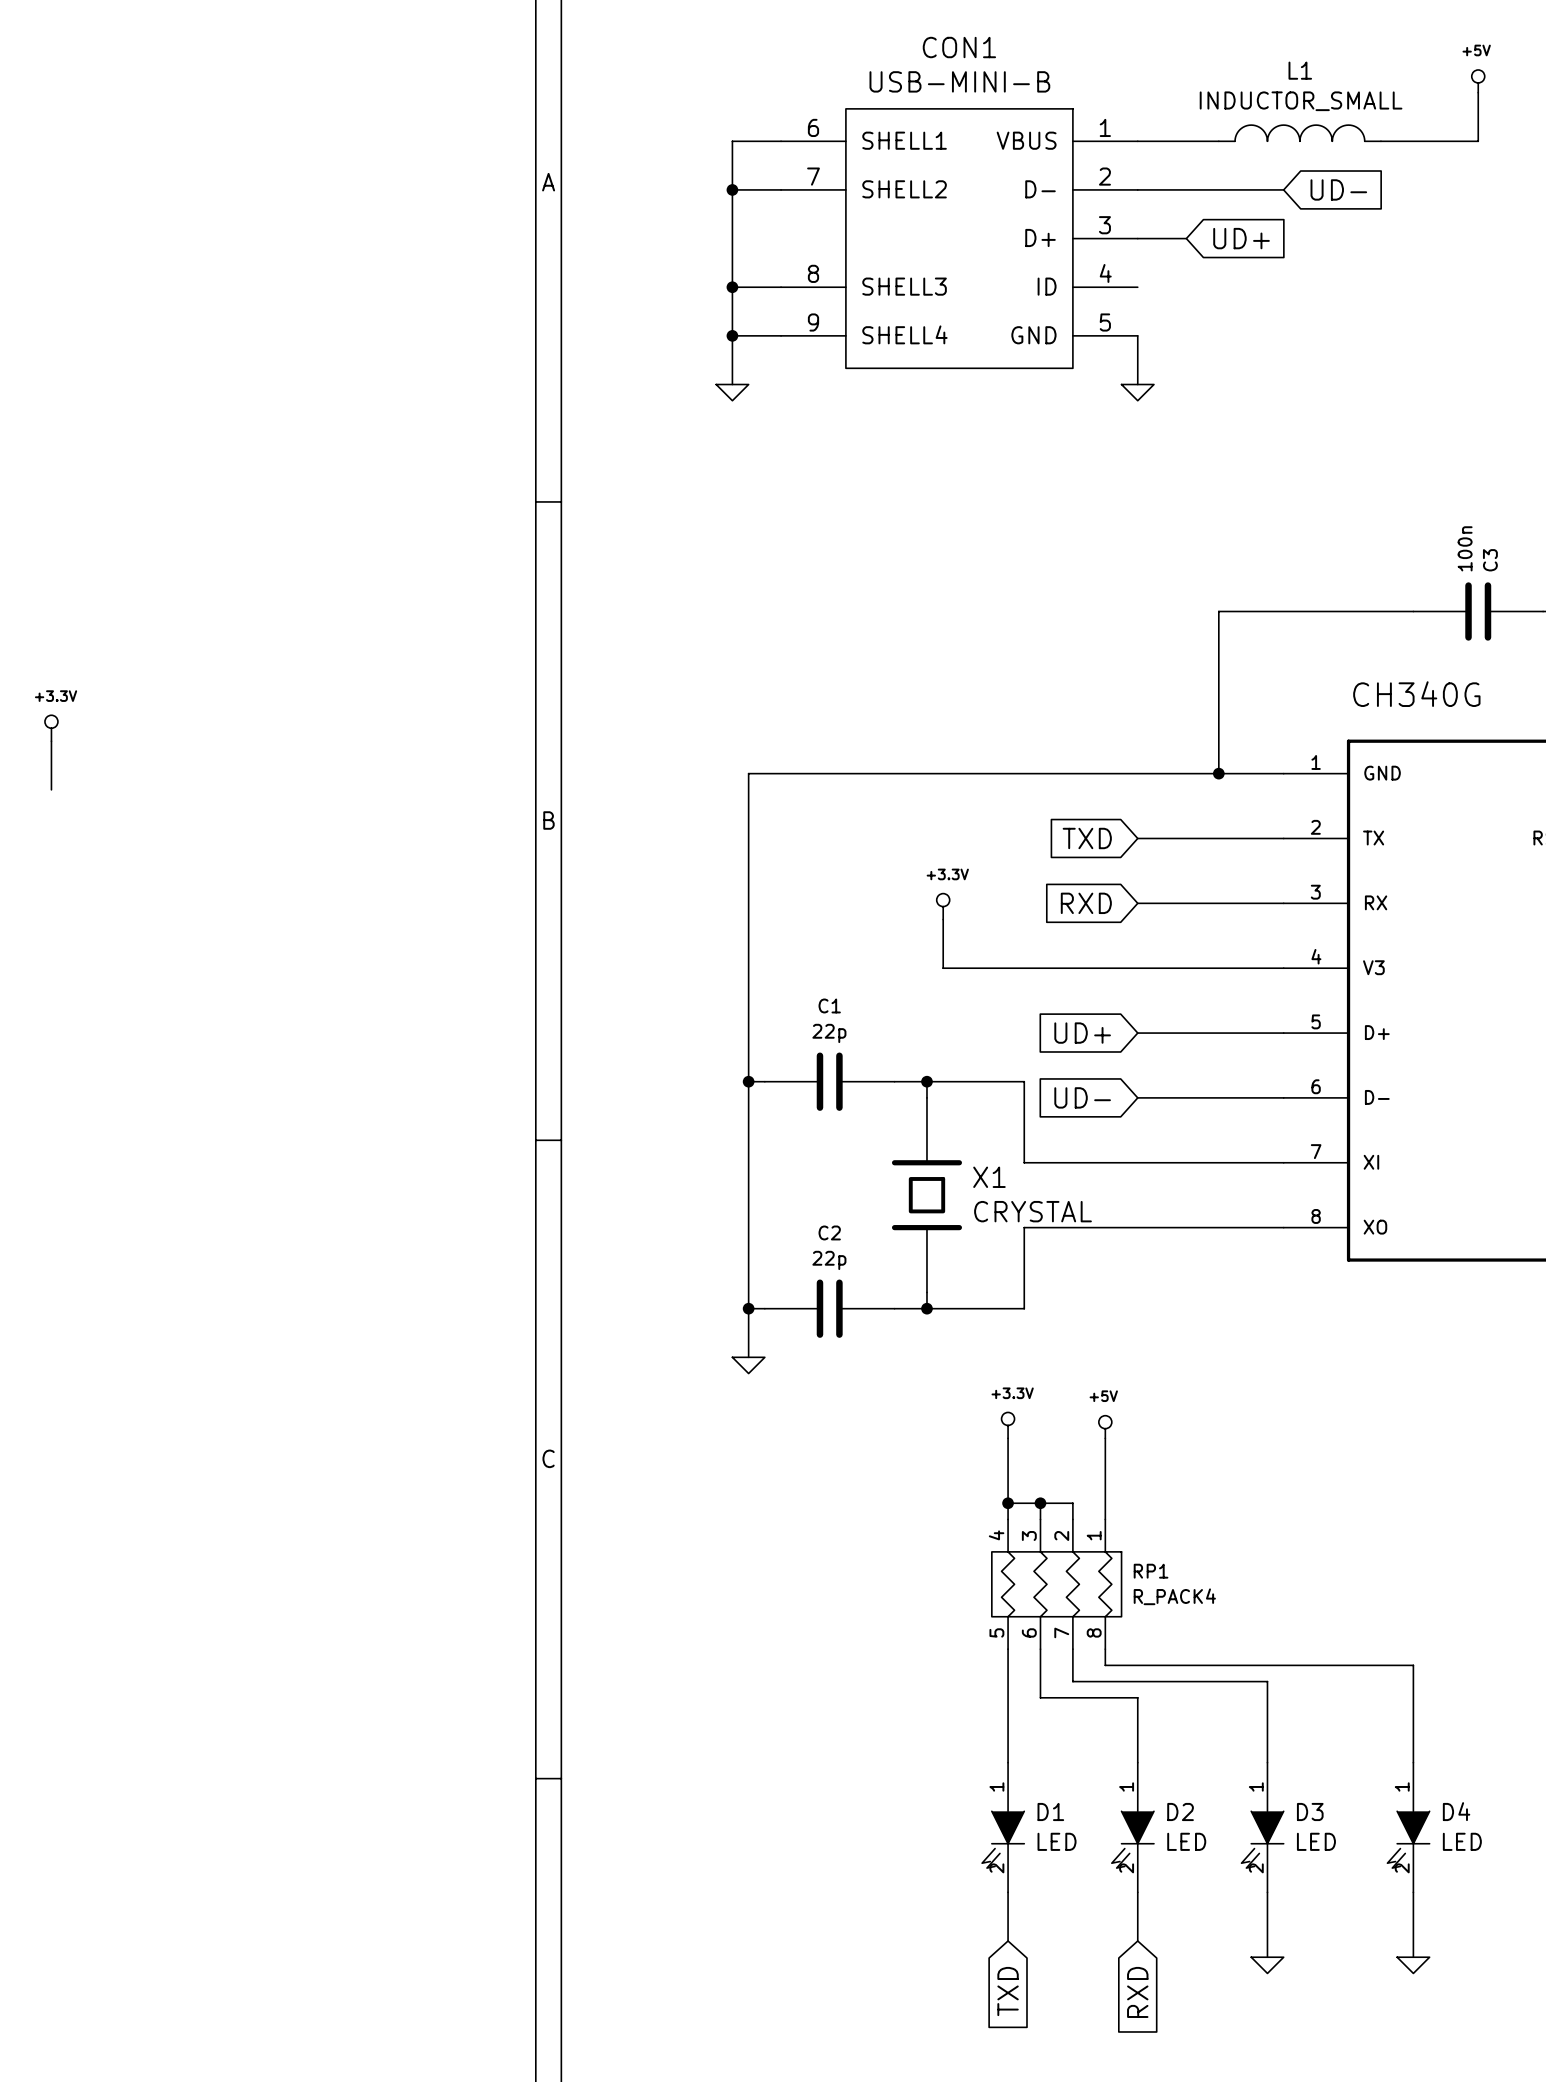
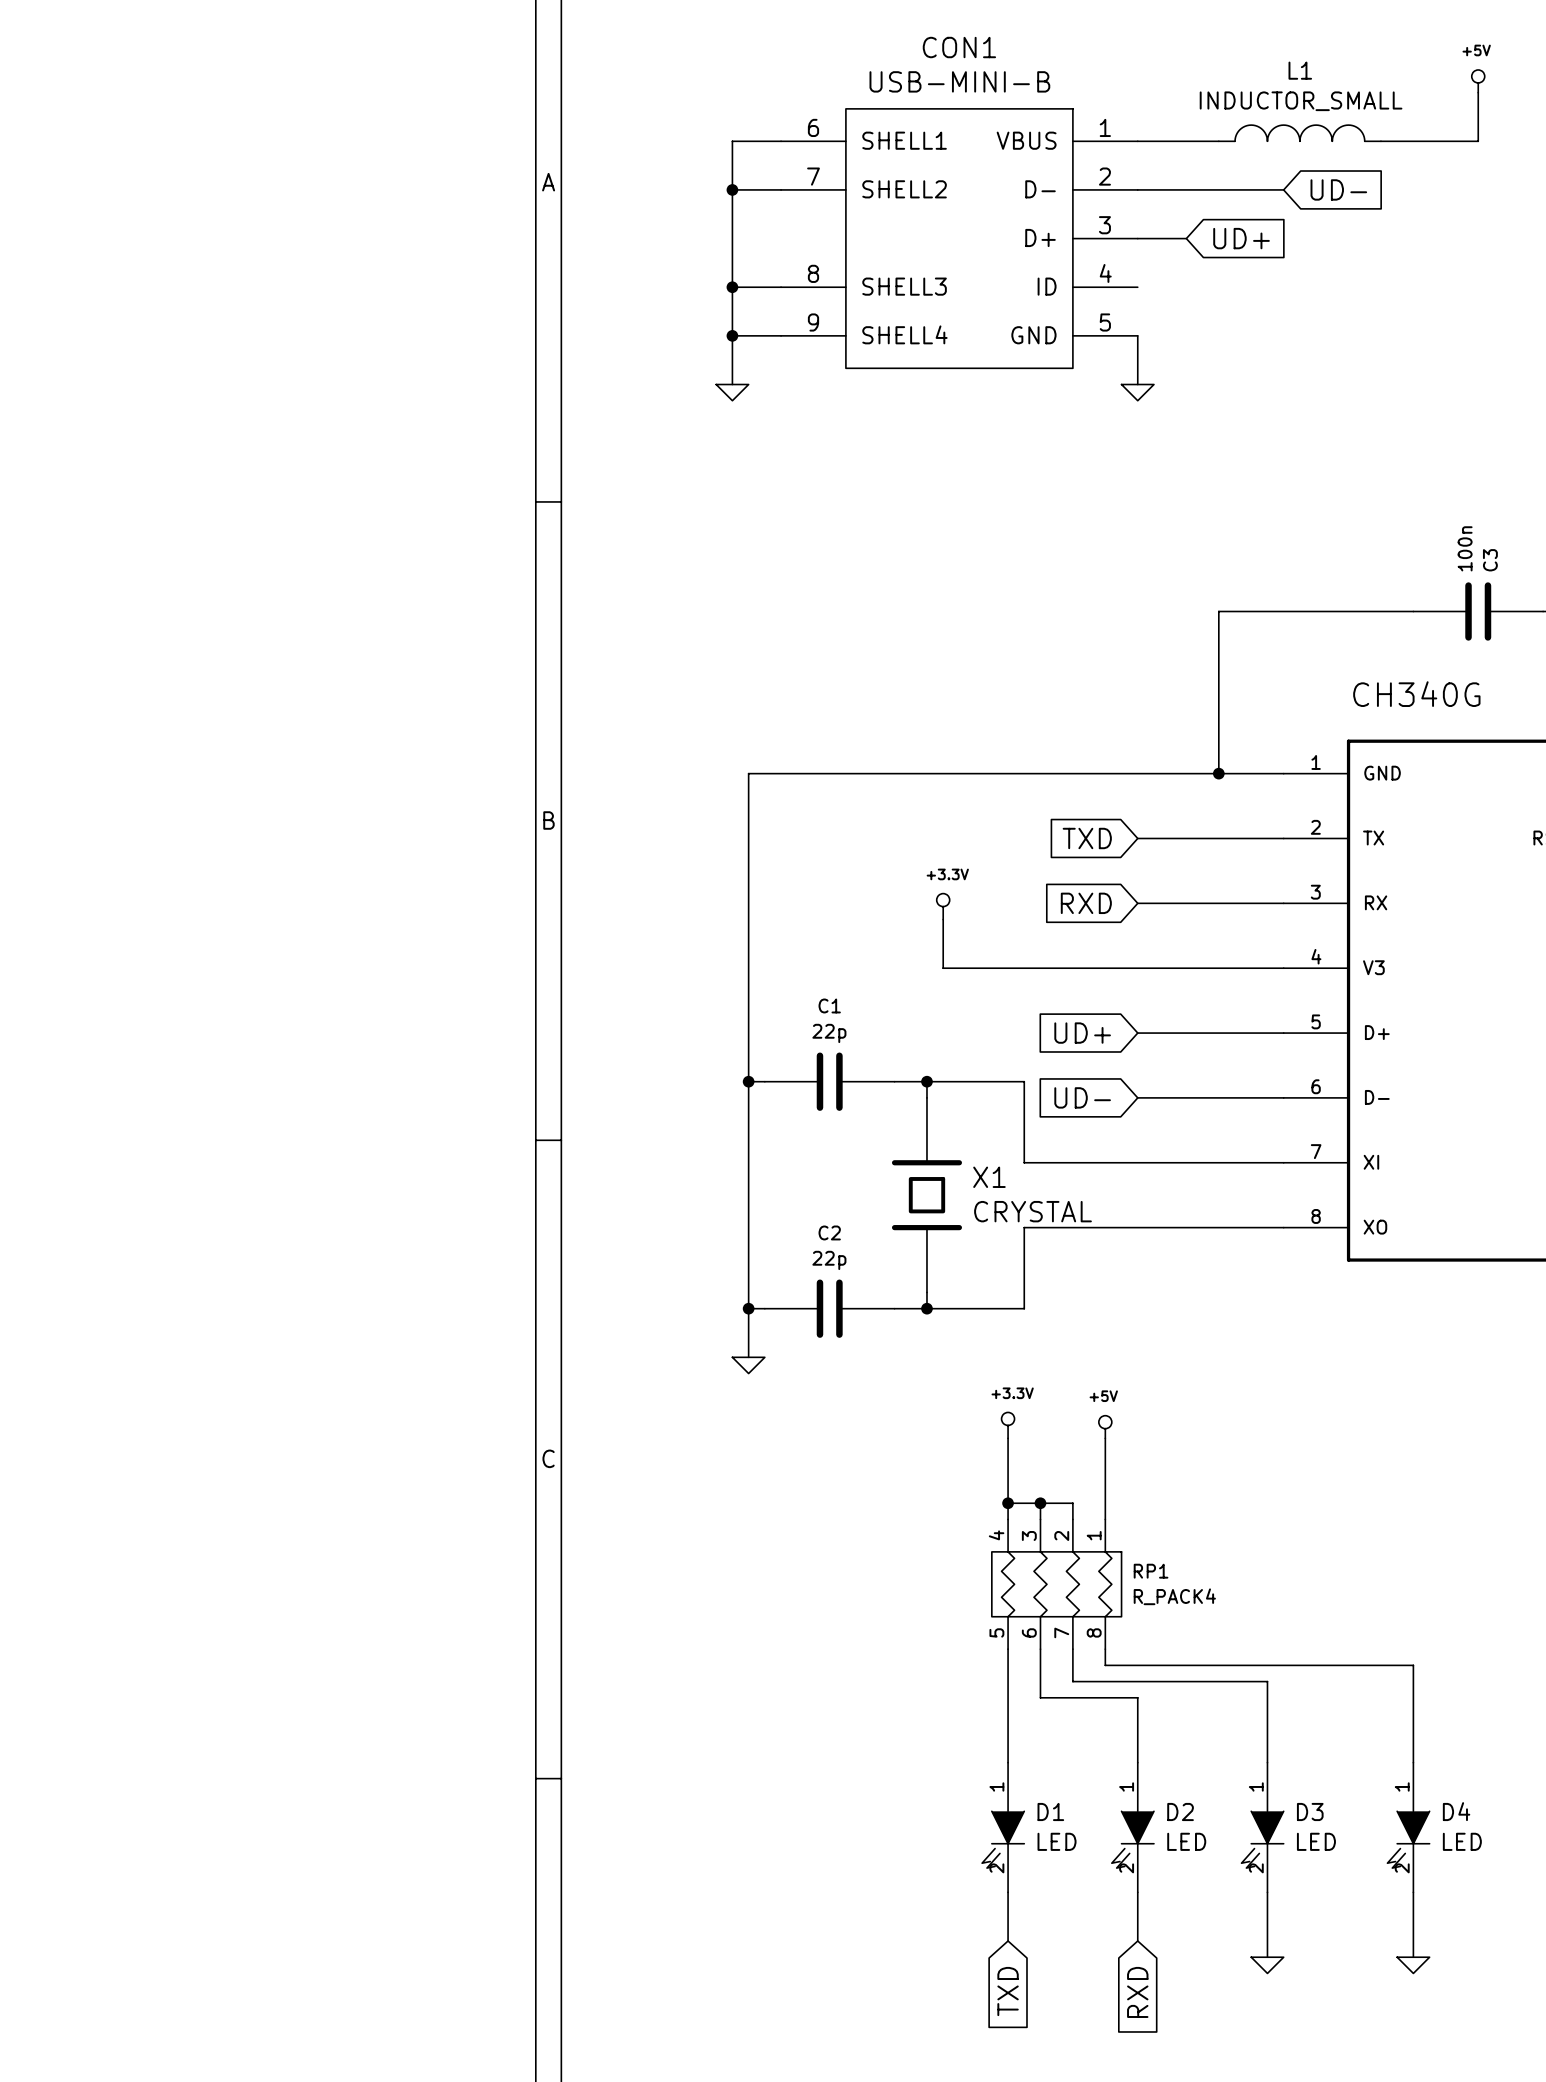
power symbol: +3.3V (51, 728) -> none
wire: (51, 741) (51, 789) -> none

